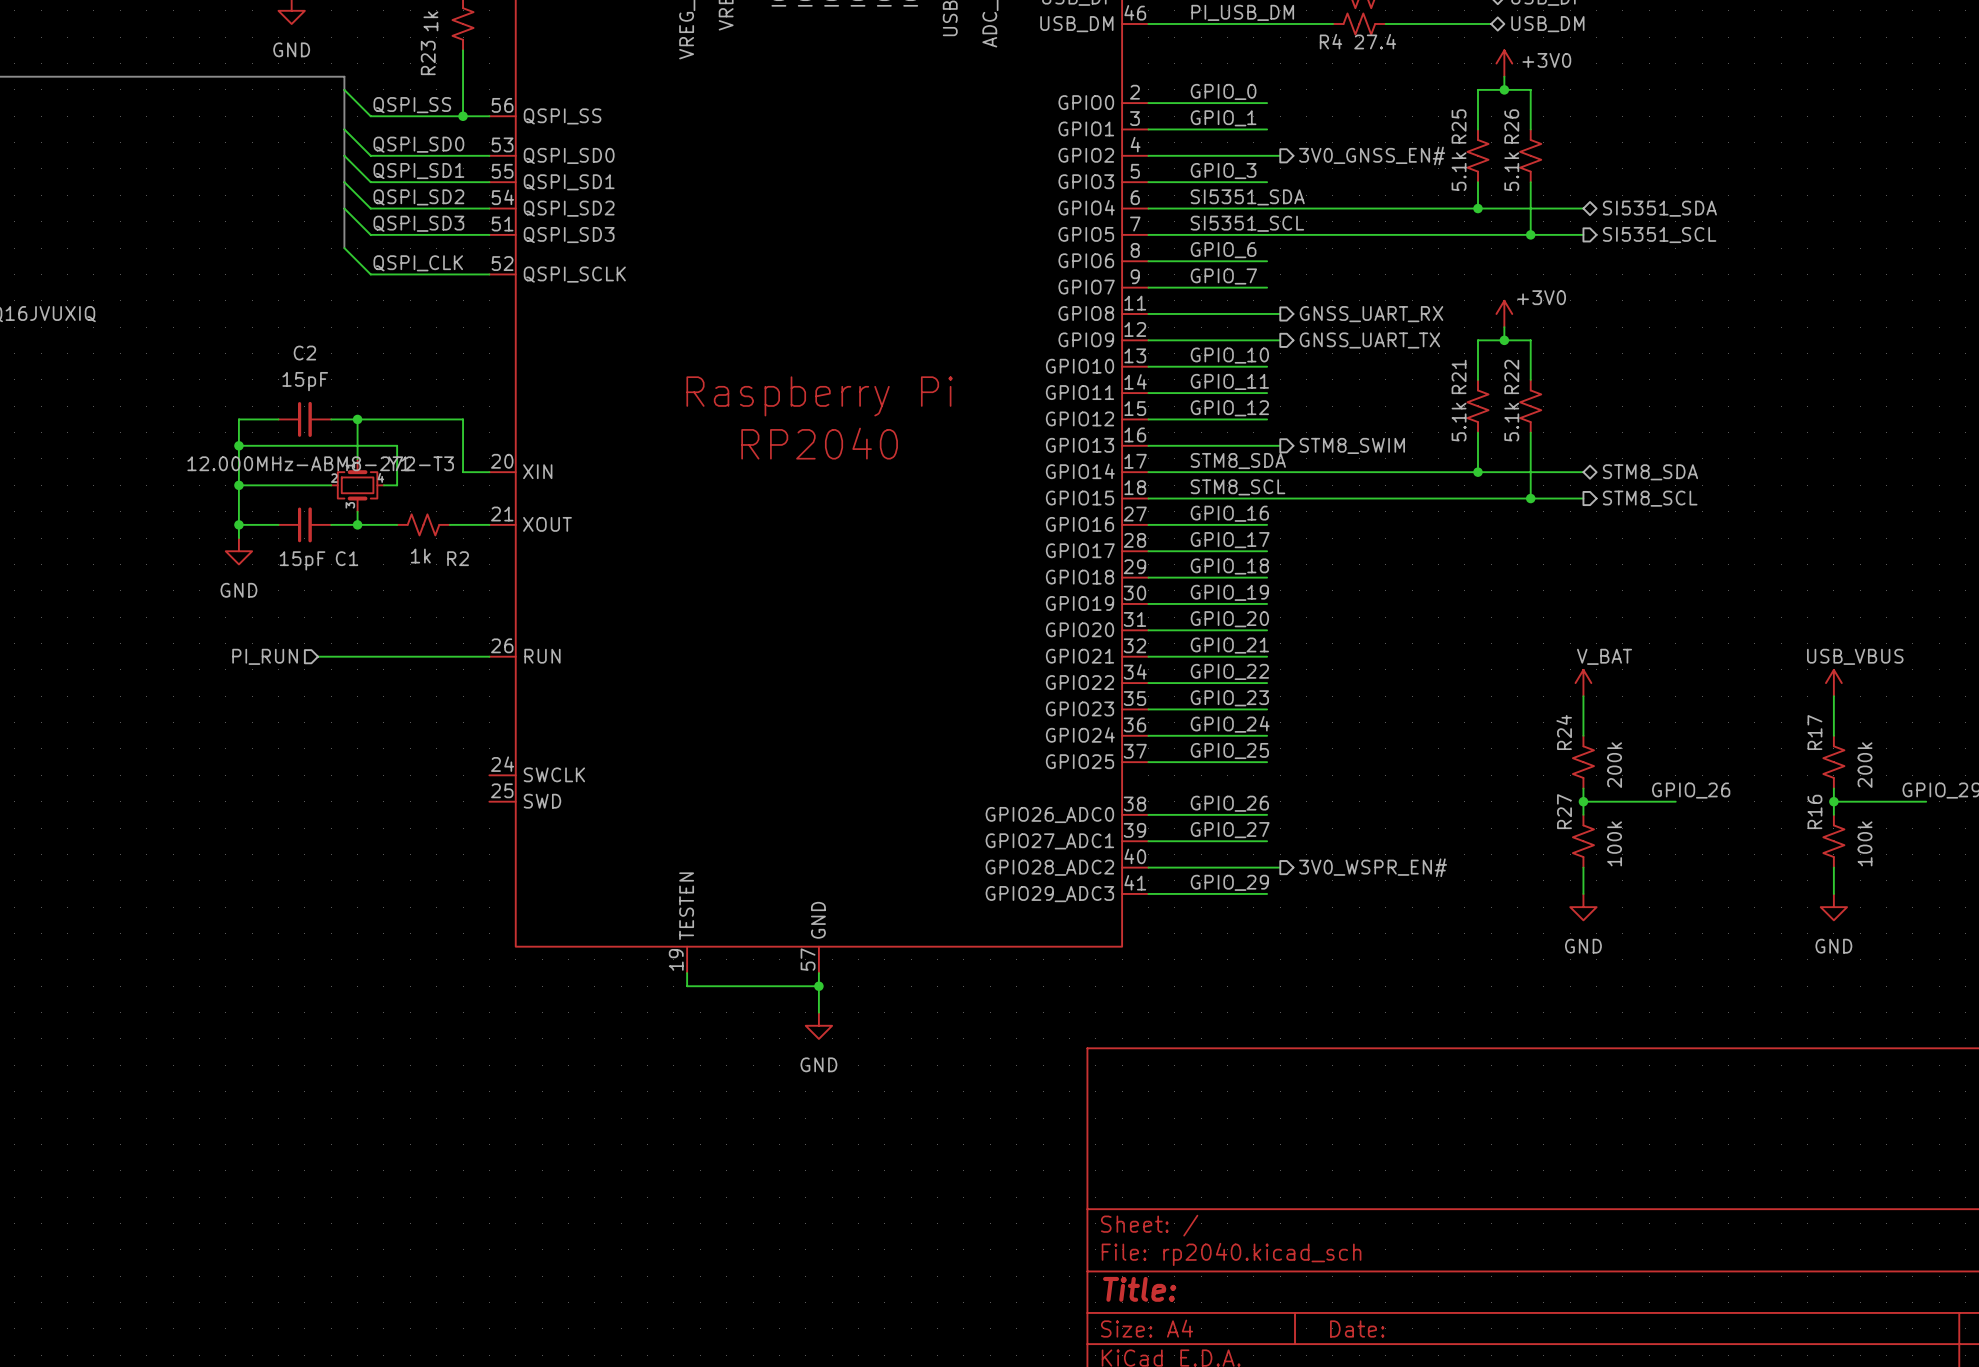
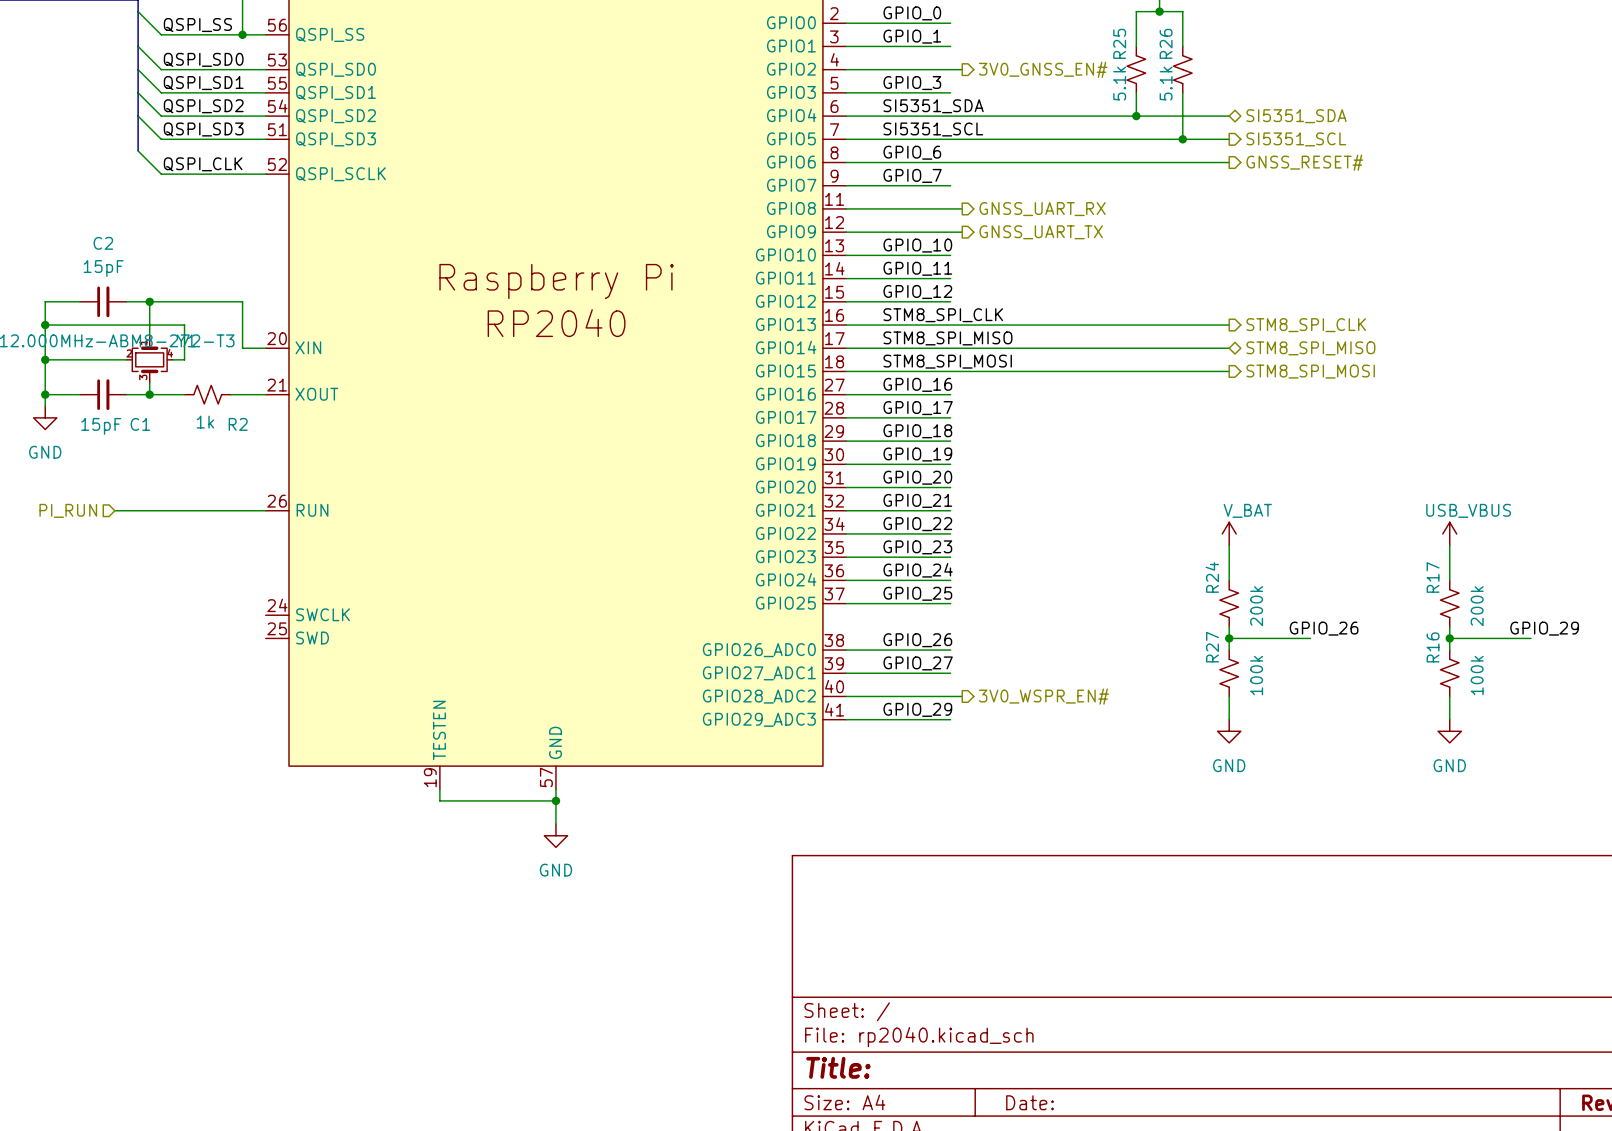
wire: none -> (950, 162) (1229, 162)
hierarchical label: none -> GNSS_RESET# (1304, 162)
power symbol: +3V0 (1504, 313) -> none
wire: (1504, 327) (1504, 340) -> none
junction: (1504, 340) -> none
wire: (1477, 379) (1477, 340) (1530, 340) (1530, 379) -> none
R21: 5.1k (1477, 406) -> none
R22: 5.1k (1530, 406) -> none
wire: (1477, 432) (1477, 472) -> none
wire: (1530, 432) (1530, 498) -> none
label: none -> STM8_SPI_CLK (943, 315)
wire: none -> (962, 325) (1229, 325)
hierarchical label: STM8_SWIM (1352, 445) -> none
hierarchical label: none -> STM8_SPI_CLK (1306, 325)
label: STM8_SDA (1238, 461) -> STM8_SPI_MISO (947, 338)
junction: (1477, 472) -> none
hierarchical label: STM8_SDA (1650, 472) -> STM8_SPI_MISO (1310, 348)
label: STM8_SCL (1238, 487) -> STM8_SPI_MOSI (947, 361)
junction: (1530, 498) -> none
hierarchical label: STM8_SCL (1650, 498) -> STM8_SPI_MOSI (1310, 371)

